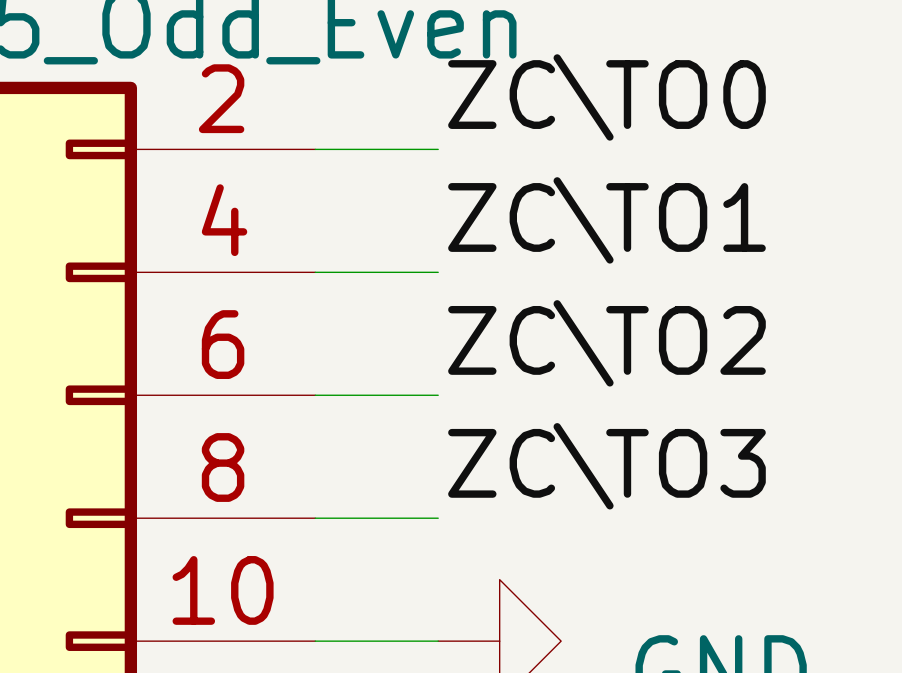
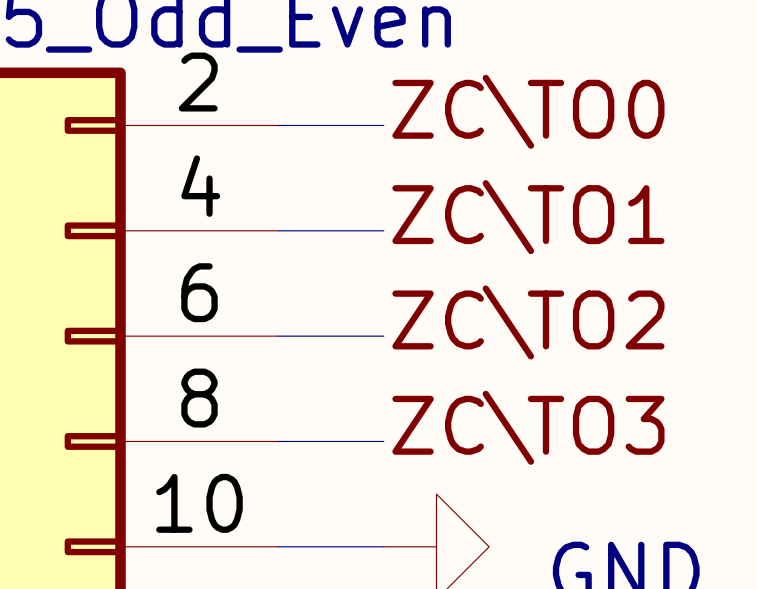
label position: ZC\TO0 (606, 97) -> ZC\TO0 (528, 111)
label position: ZC\TO1 (606, 220) -> ZC\TO1 (528, 217)
label position: ZC\TO2 (606, 343) -> ZC\TO2 (528, 322)
label position: ZC\TO3 (606, 466) -> ZC\TO3 (528, 427)

